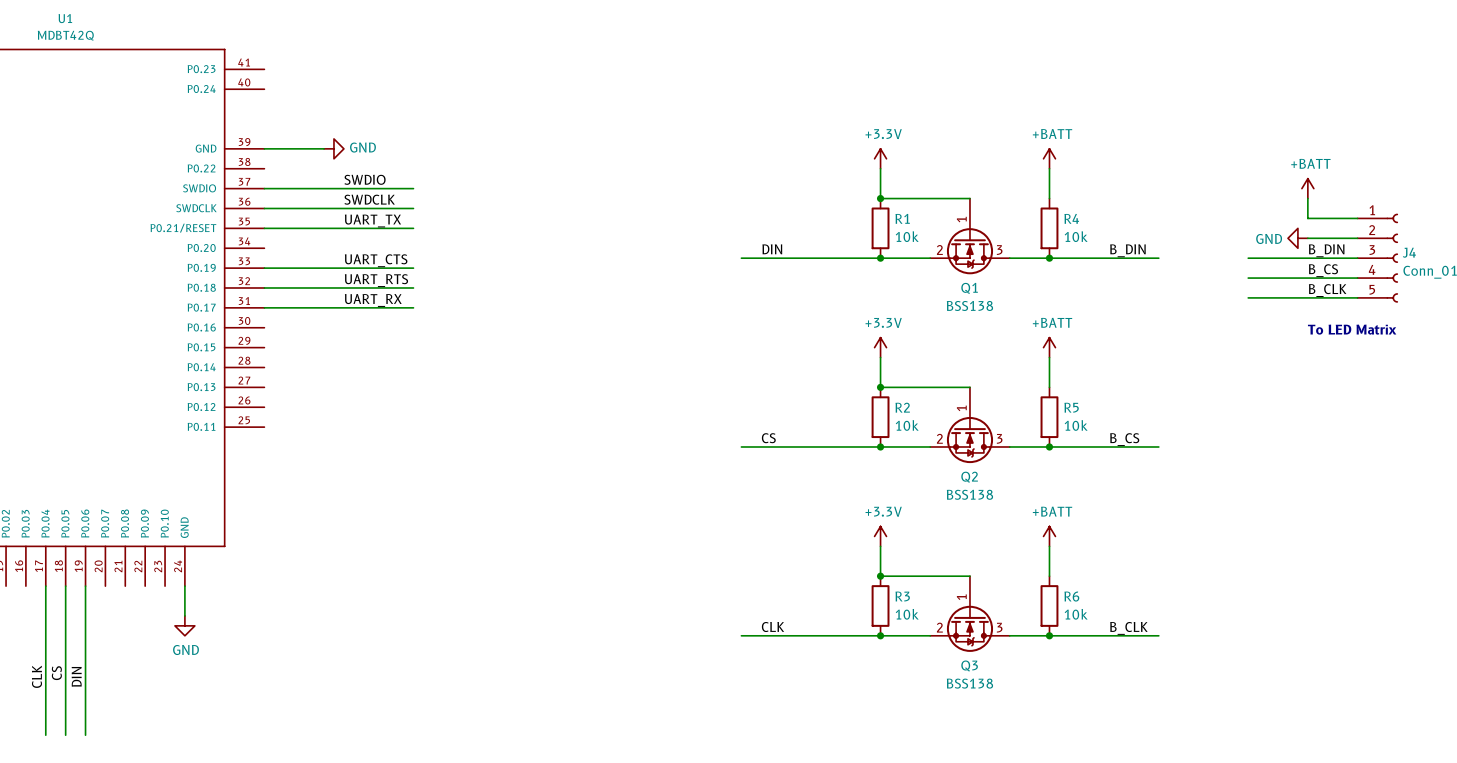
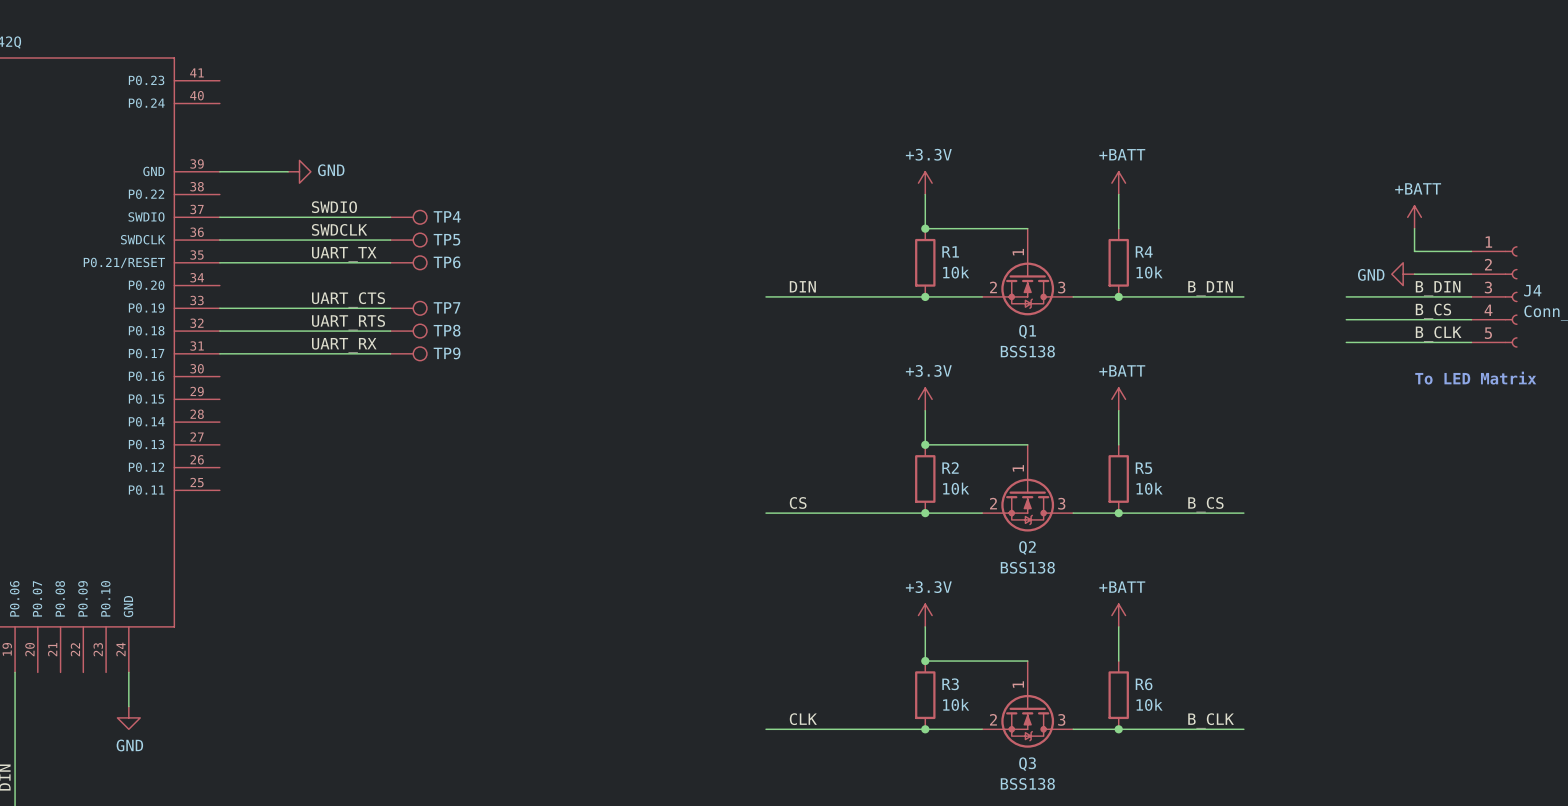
TP4: none -> (408, 217)
TP5: none -> (408, 240)
TP6: none -> (408, 262)
TP7: none -> (408, 308)
TP8: none -> (408, 331)
TP9: none -> (408, 353)

